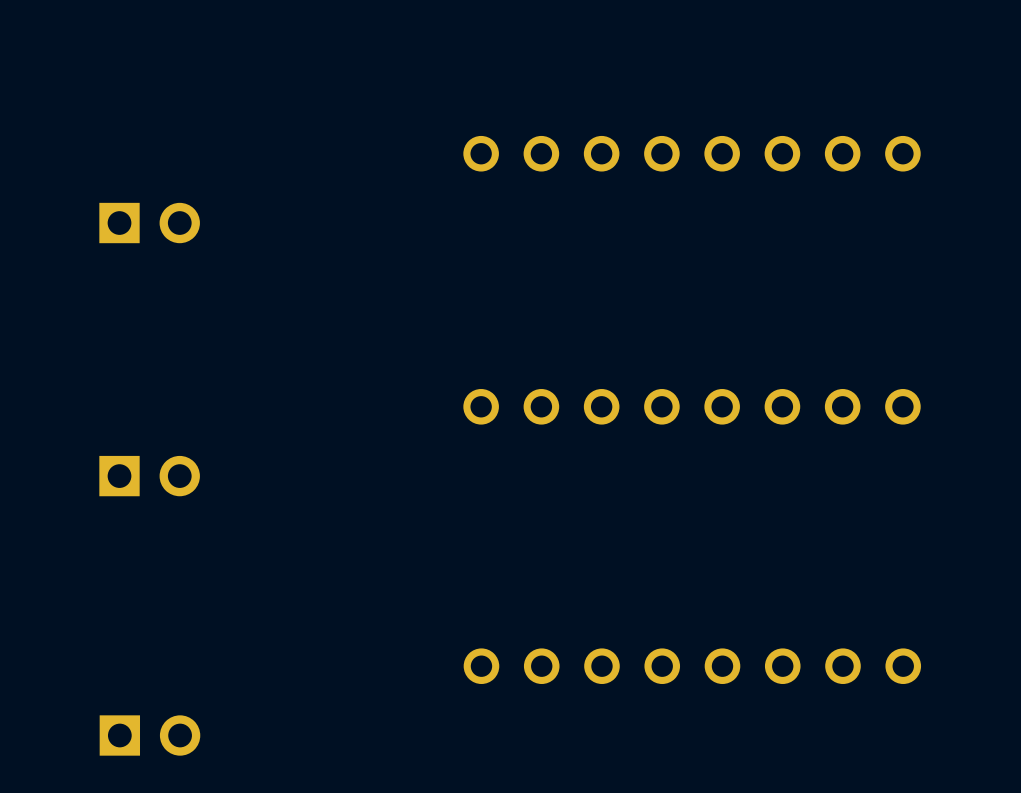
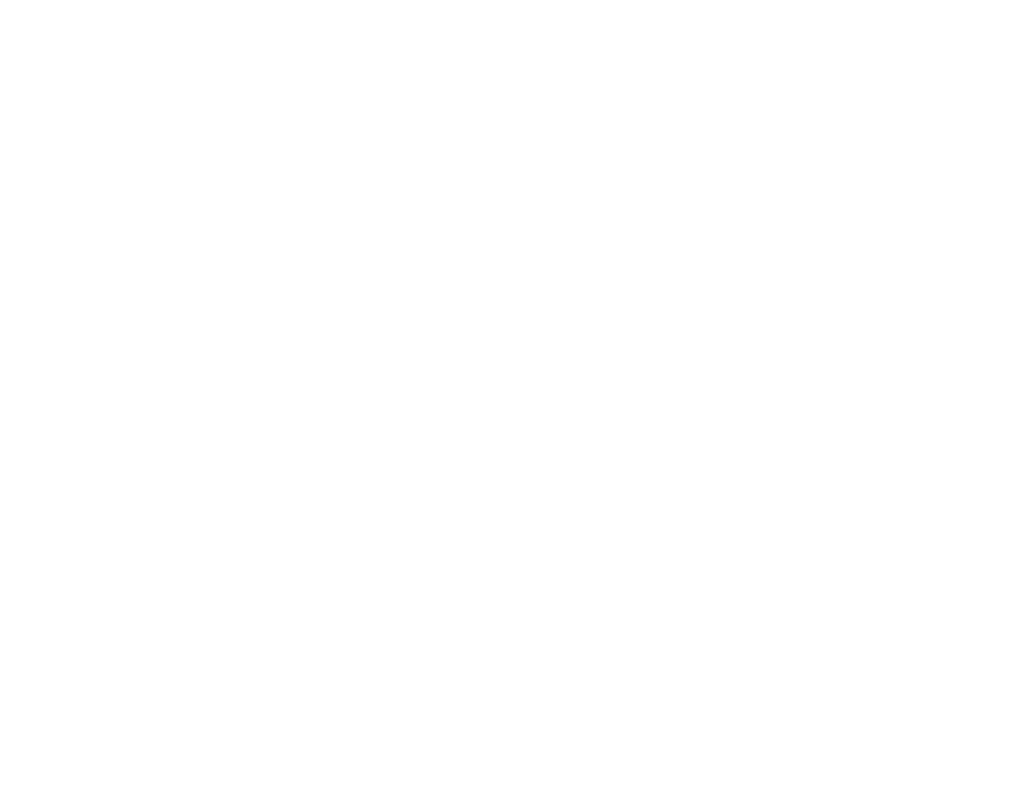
part: (692, 153) -> none
part: (149, 223) -> none
part: (692, 406) -> none
part: (149, 476) -> none
part: (692, 666) -> none
part: (149, 735) -> none

